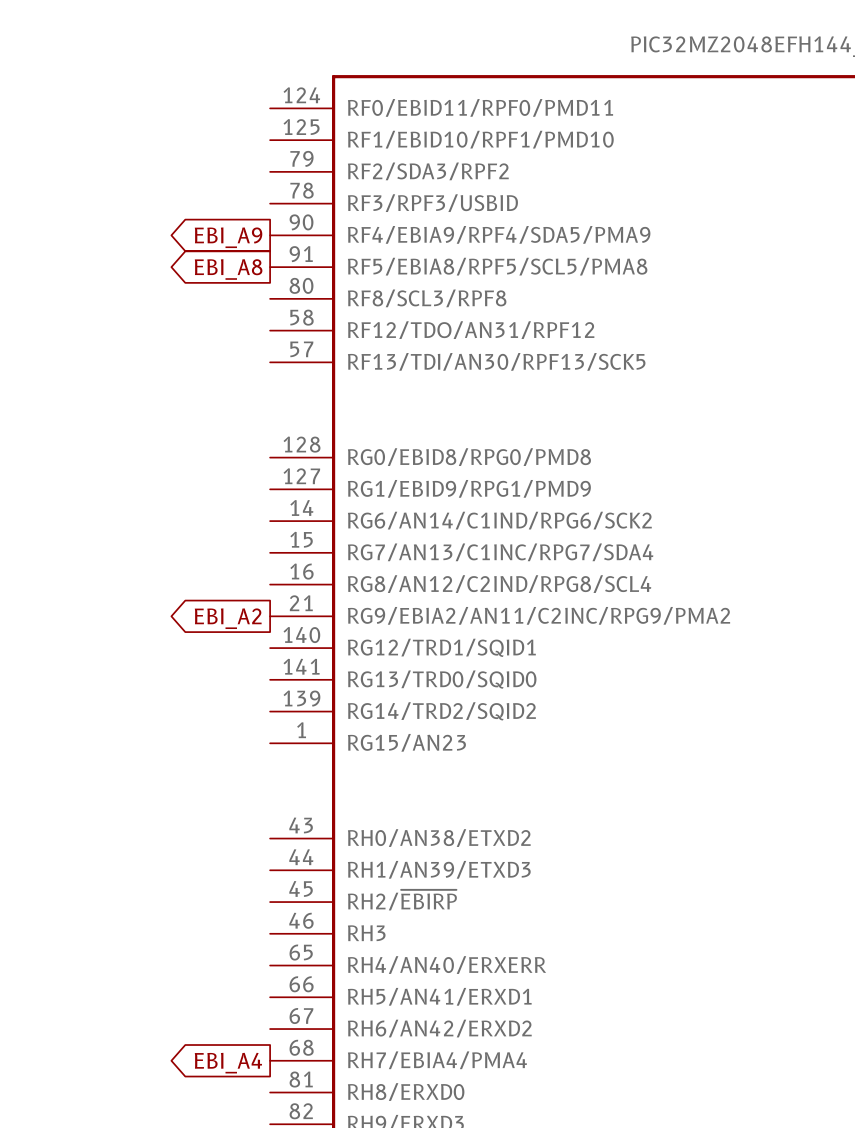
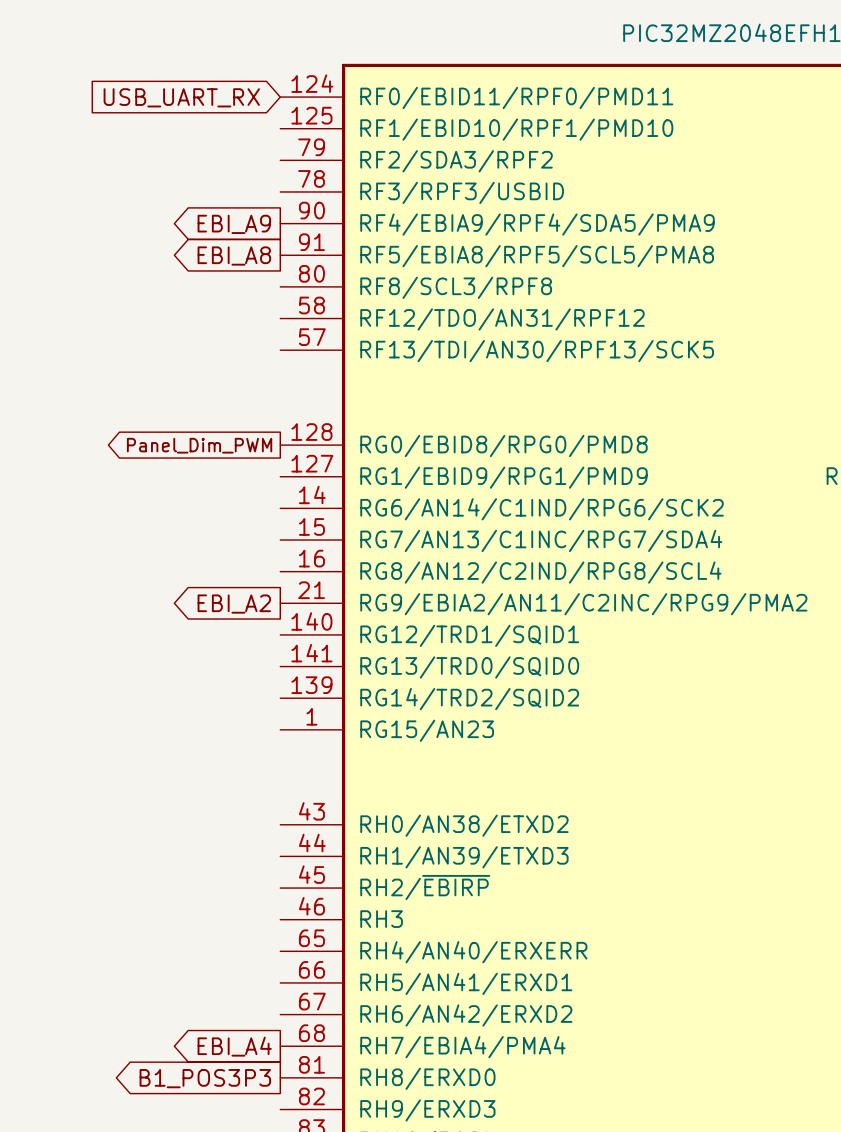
global label: none -> USB_UART_RX (181, 97)
global label: none -> Panel_Dim_PWM (199, 445)
global label: none -> B1_POS3P3 (205, 1078)

